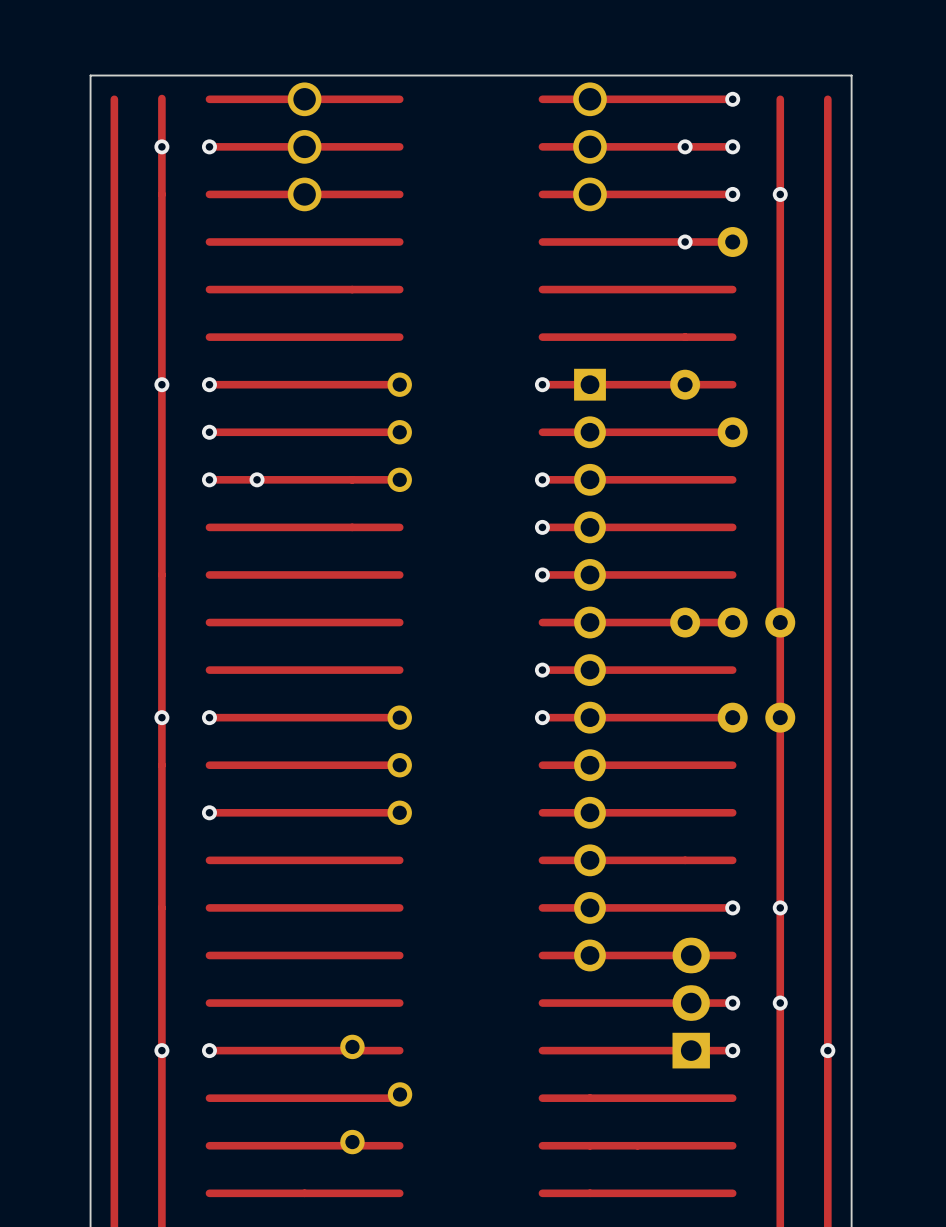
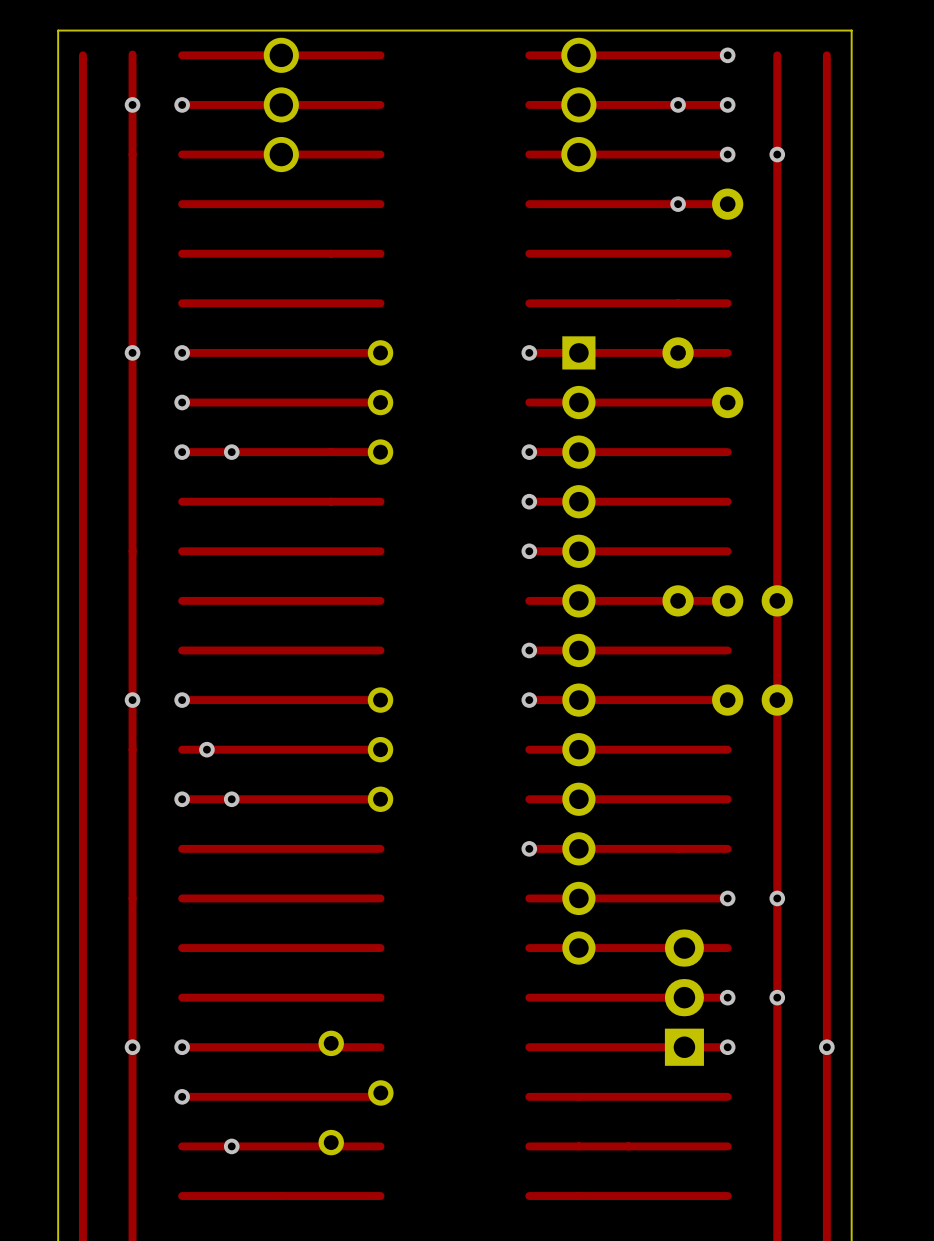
via: none -> (206, 749)
via: none -> (231, 799)
via: none -> (529, 848)
via: none -> (182, 1096)
via: none -> (231, 1146)

